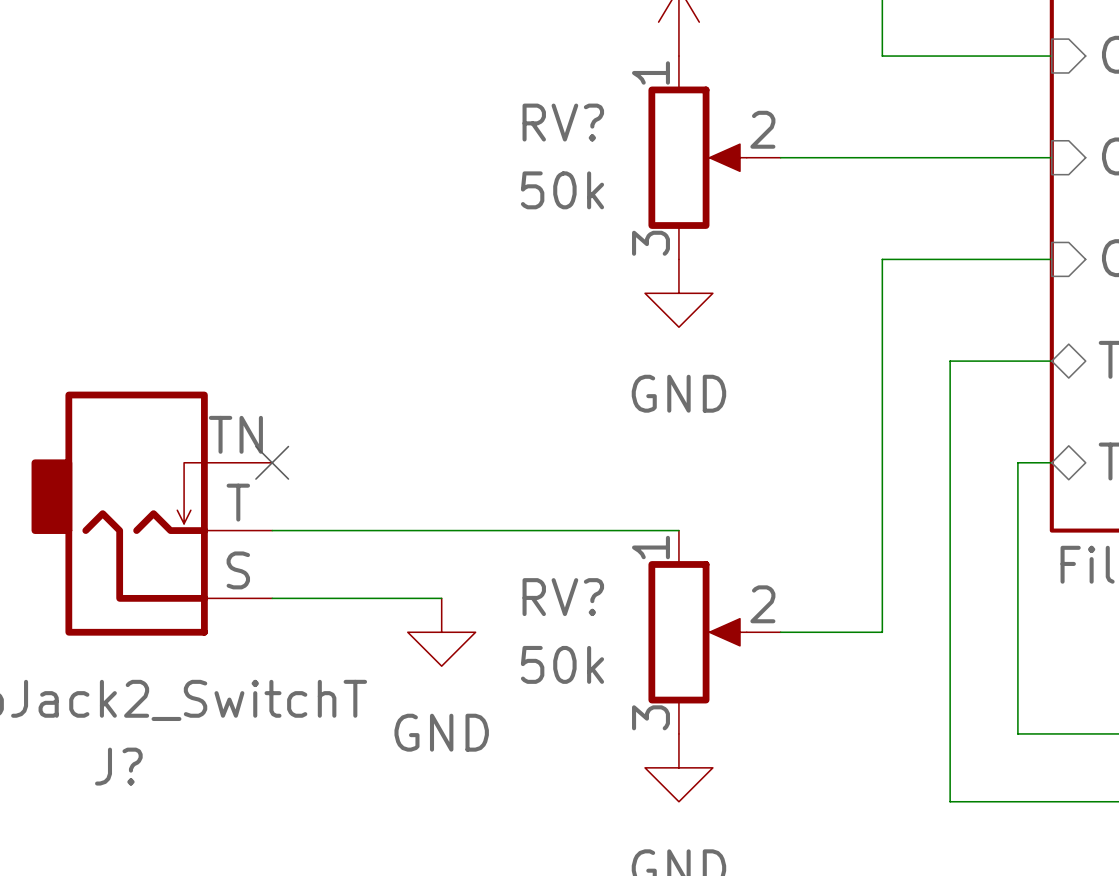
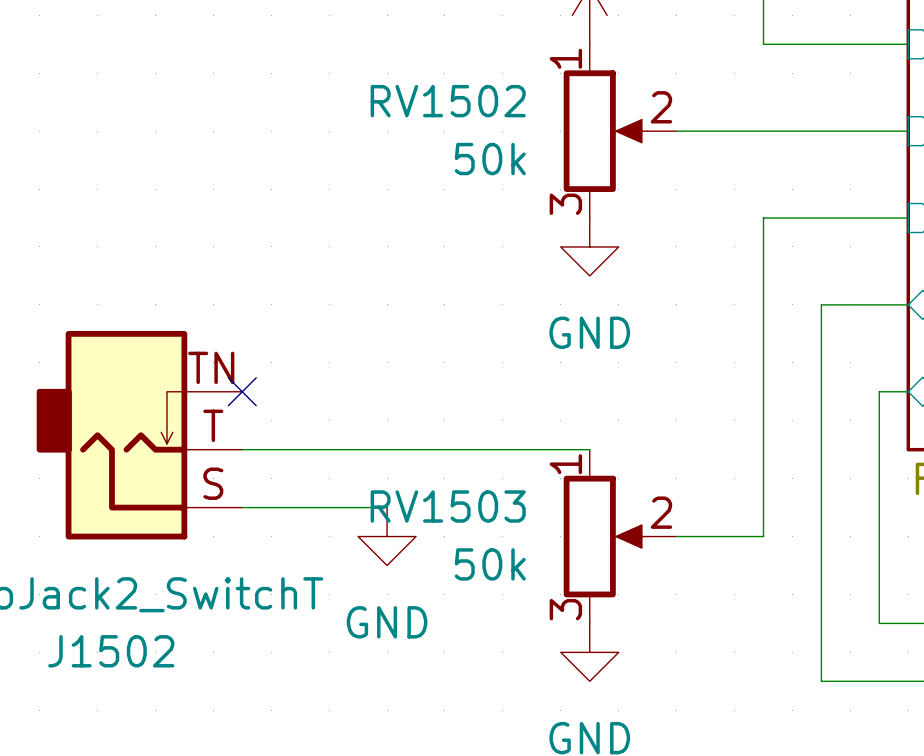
RV? name: RV? (563, 122) -> RV1502 (448, 101)
RV? name: RV? (563, 597) -> RV1503 (448, 506)
J? name: J? (118, 766) -> J1502 (111, 651)

